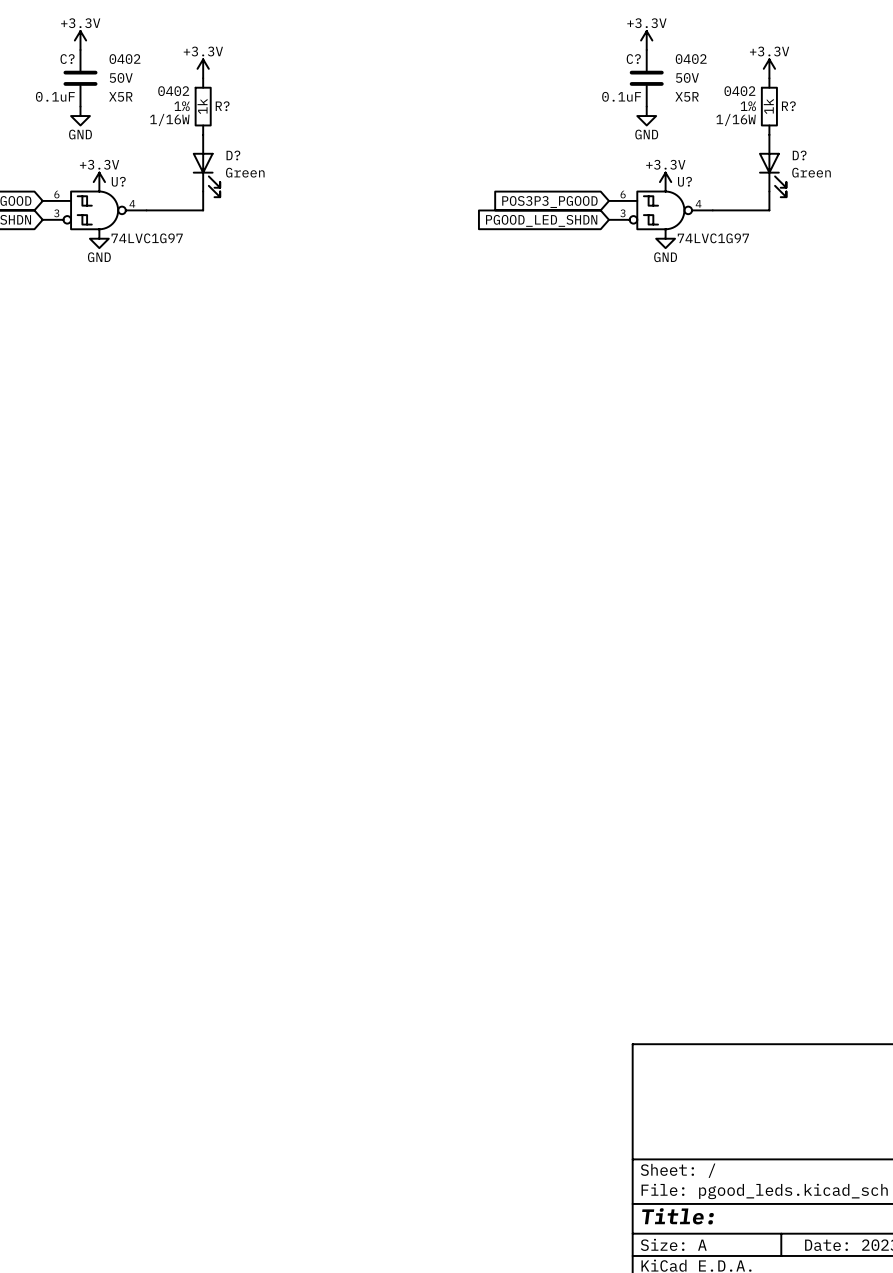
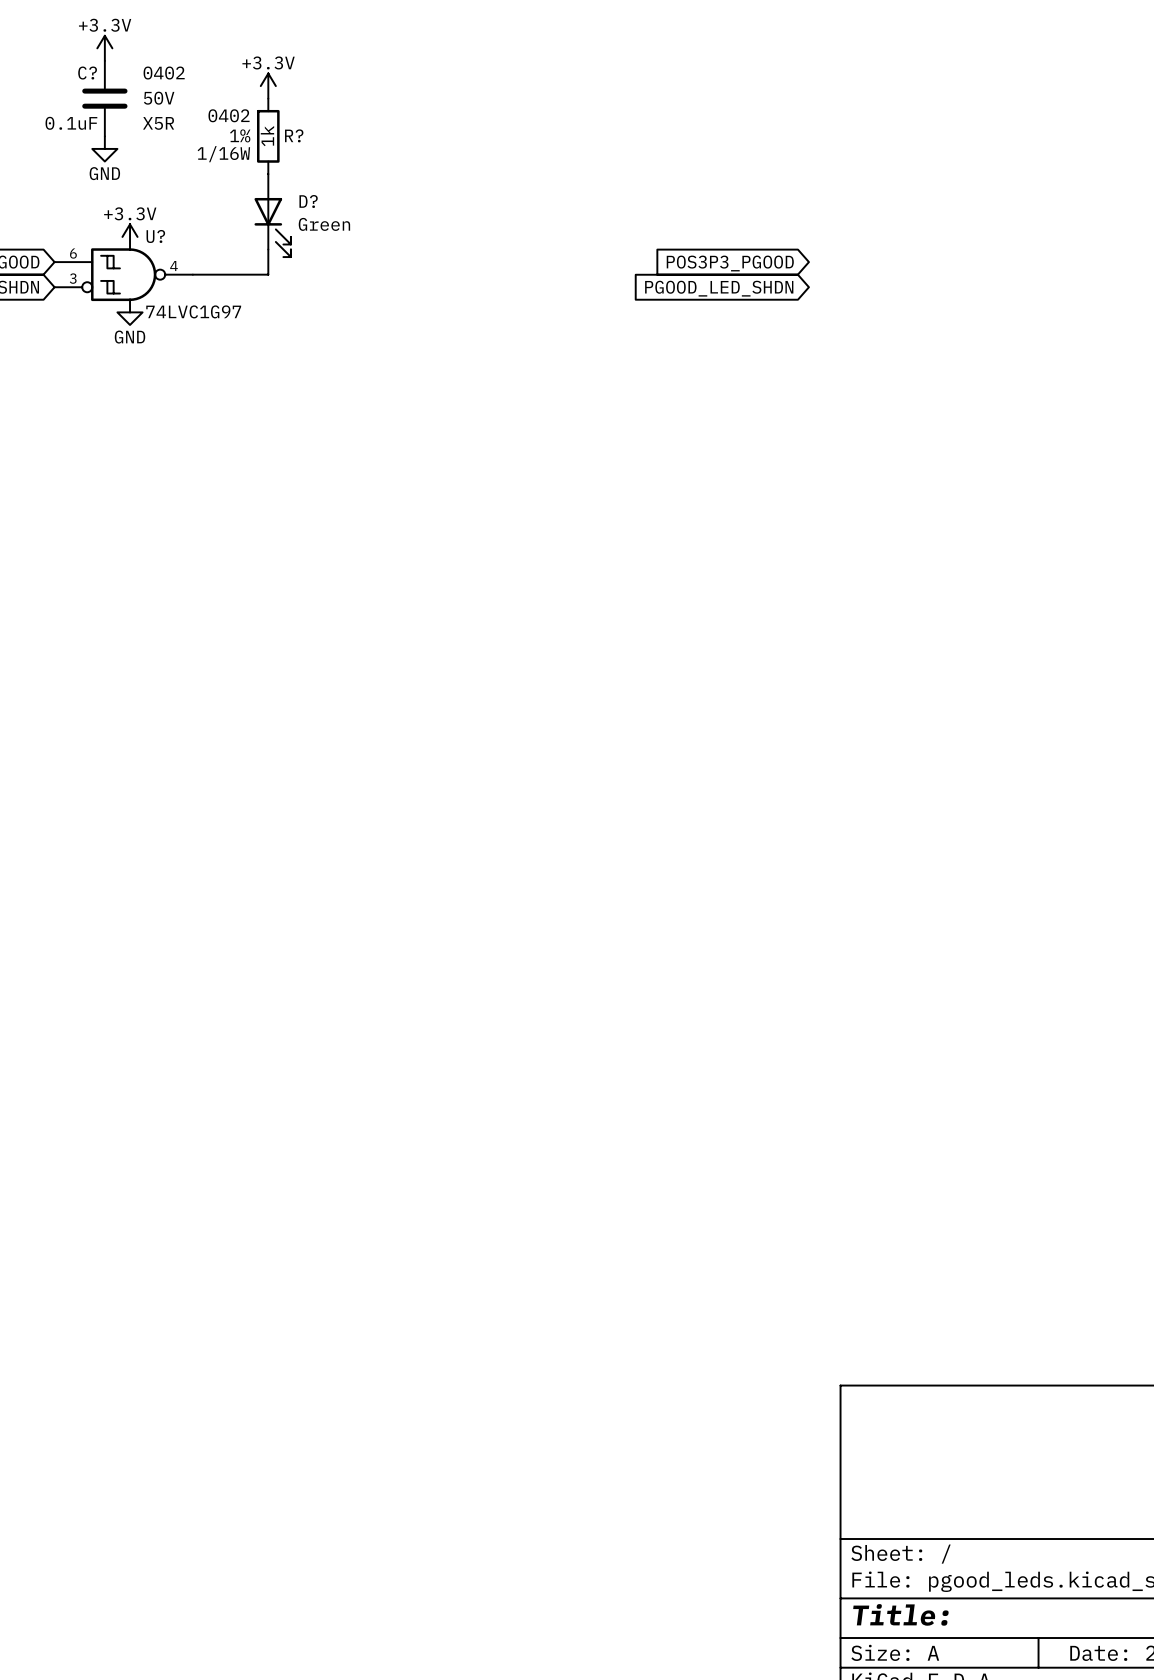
power symbol: +3.3V (646, 40) -> none
power symbol: +3.3V (769, 68) -> none
C?: 0.1uF (646, 78) -> none
R?: 1k (769, 106) -> none
power symbol: GND (646, 116) -> none
D?: Green (772, 166) -> none
power symbol: +3.3V (665, 182) -> none
wire: (769, 191) (769, 210) (712, 210) -> none
U?: 74LVC1G97 (660, 210) -> none
power symbol: GND (665, 238) -> none

